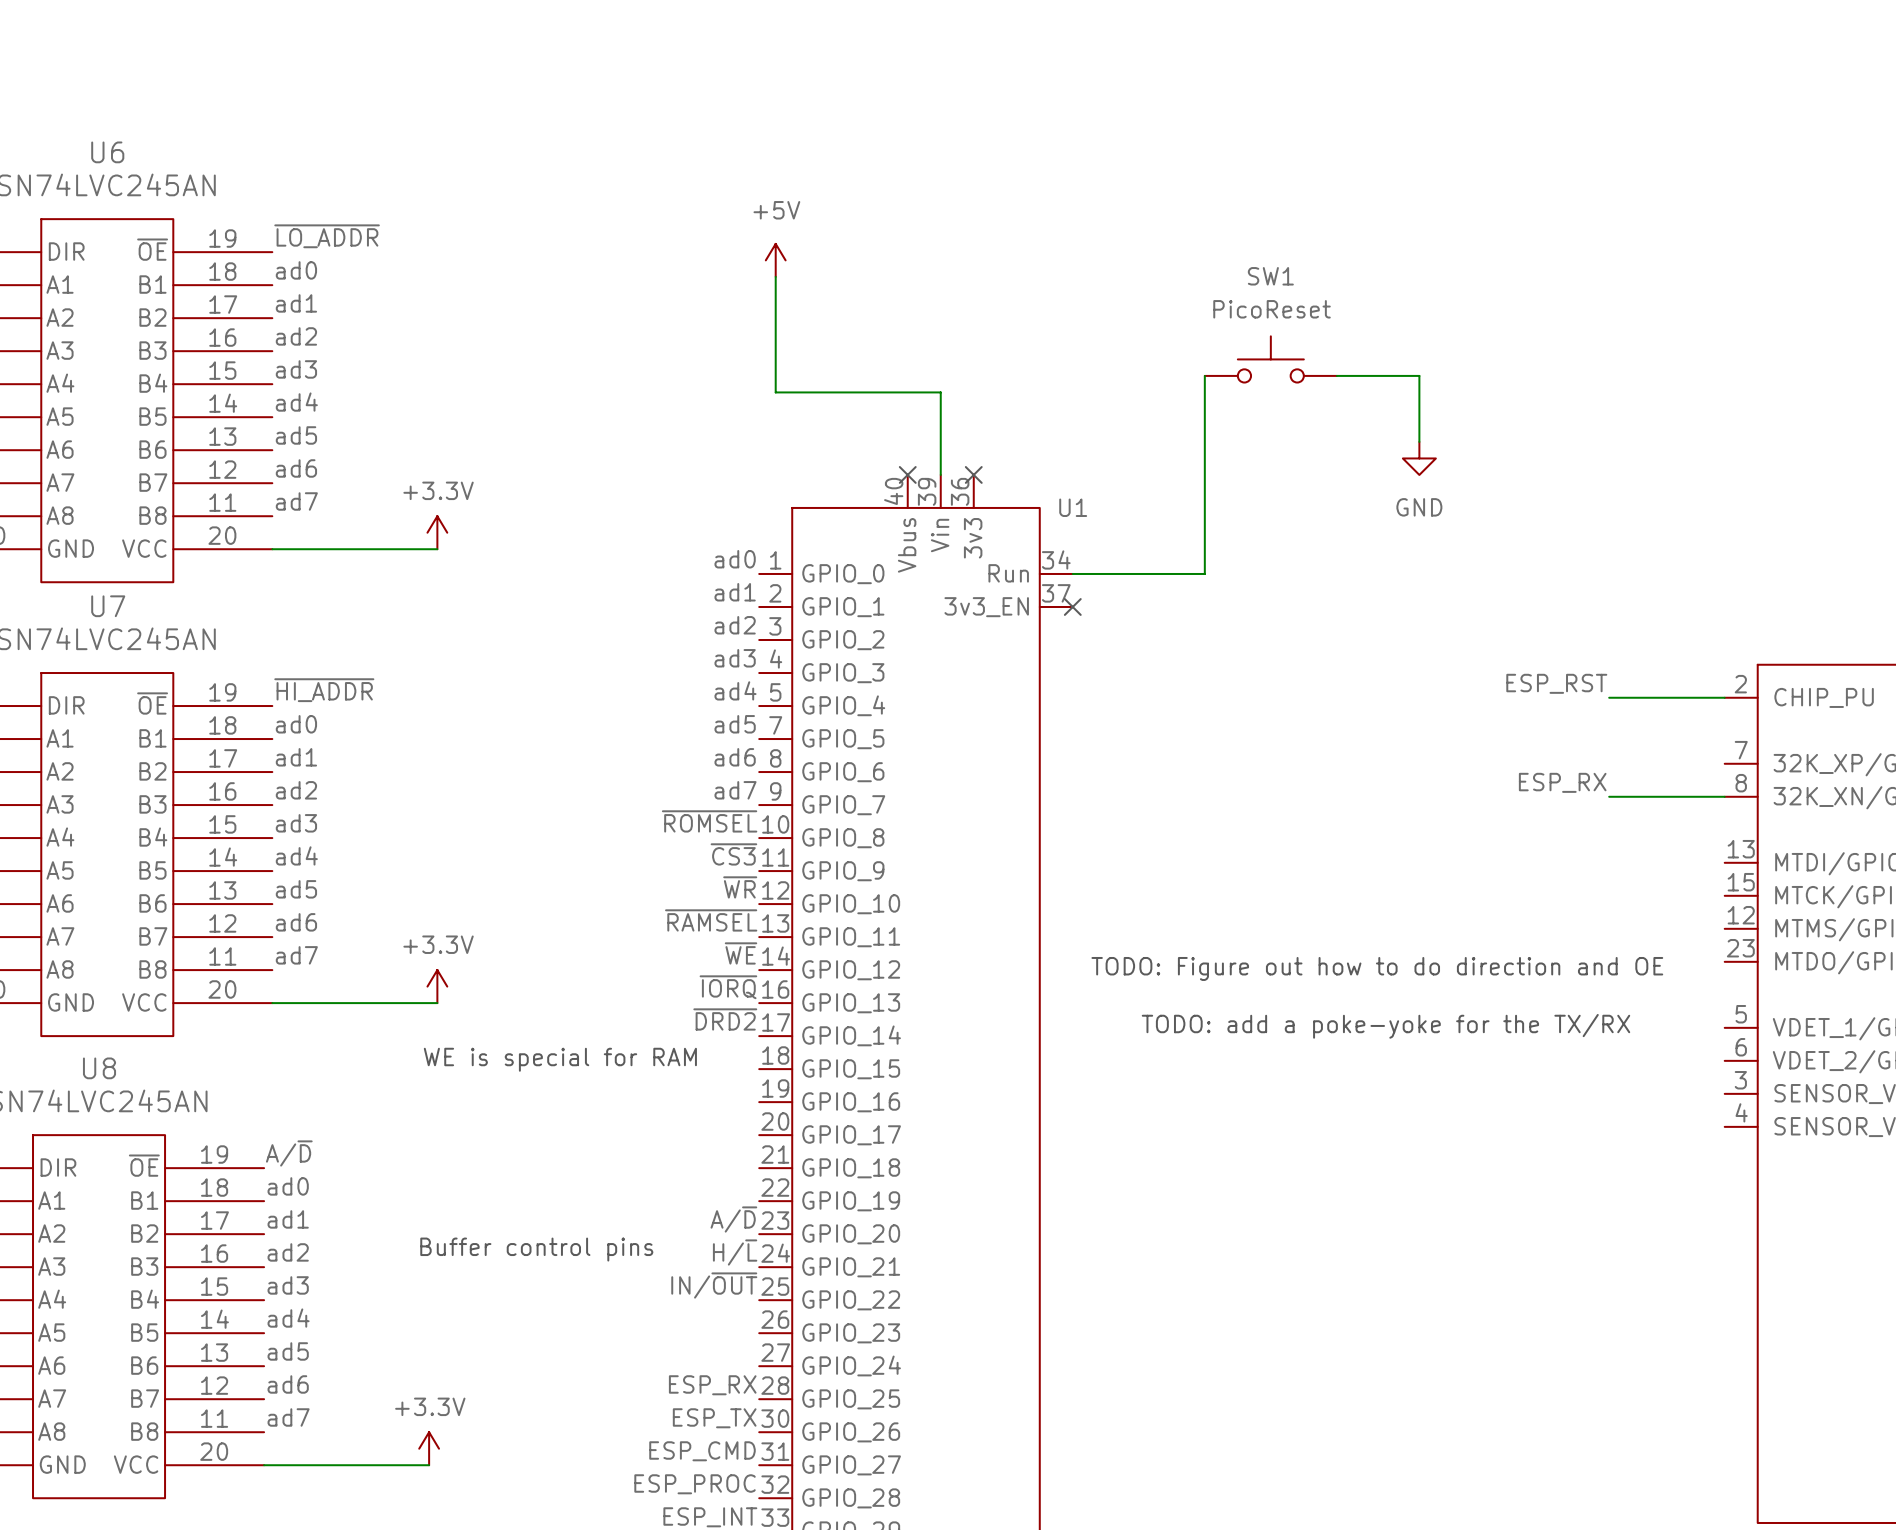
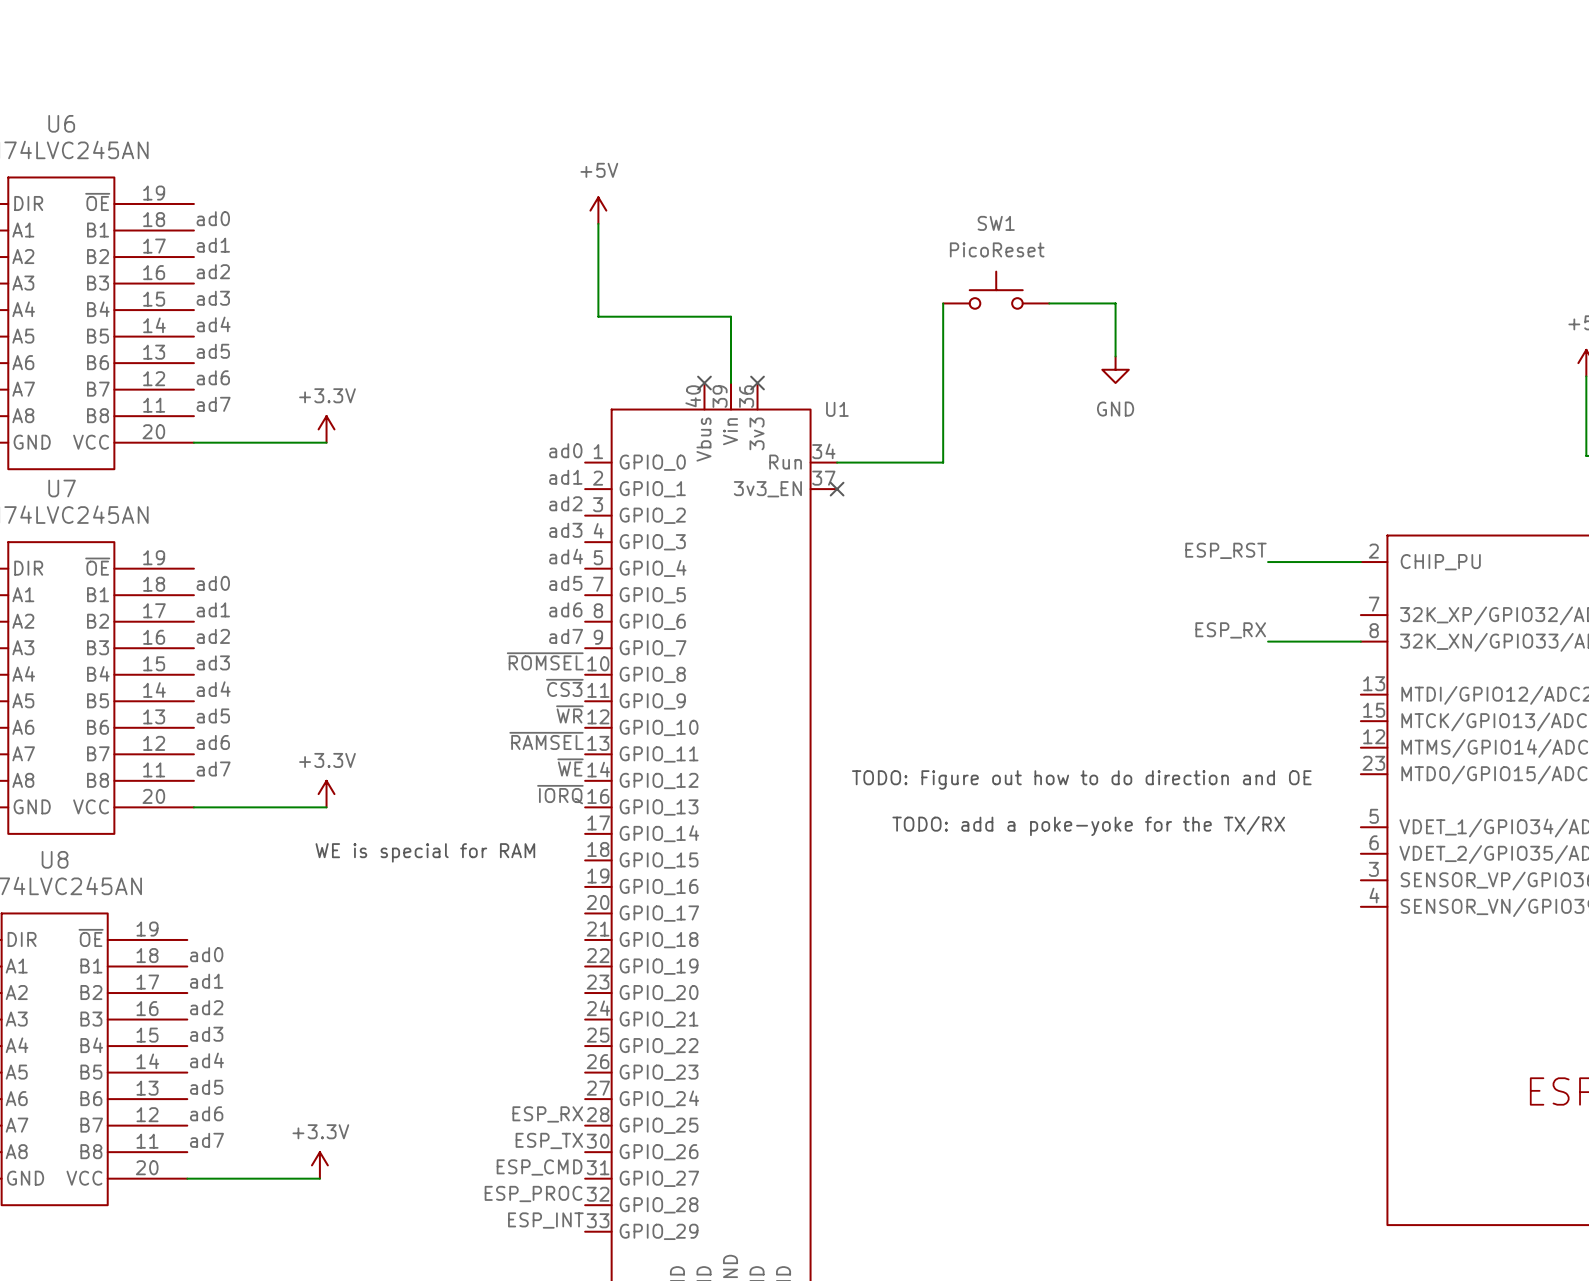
label: ~{LO_ADDR} (327, 236) -> none
label: ~{HI_ADDR} (324, 690) -> none
label: ~{DRD2} (725, 1019) -> none
label: A/~{D} (289, 1153) -> none
label: A/~{D} (733, 1219) -> none
text: Buffer control pins (536, 1249) -> none
label: H/~{L} (735, 1252) -> none
label: IN/~{OUT} (714, 1285) -> none

